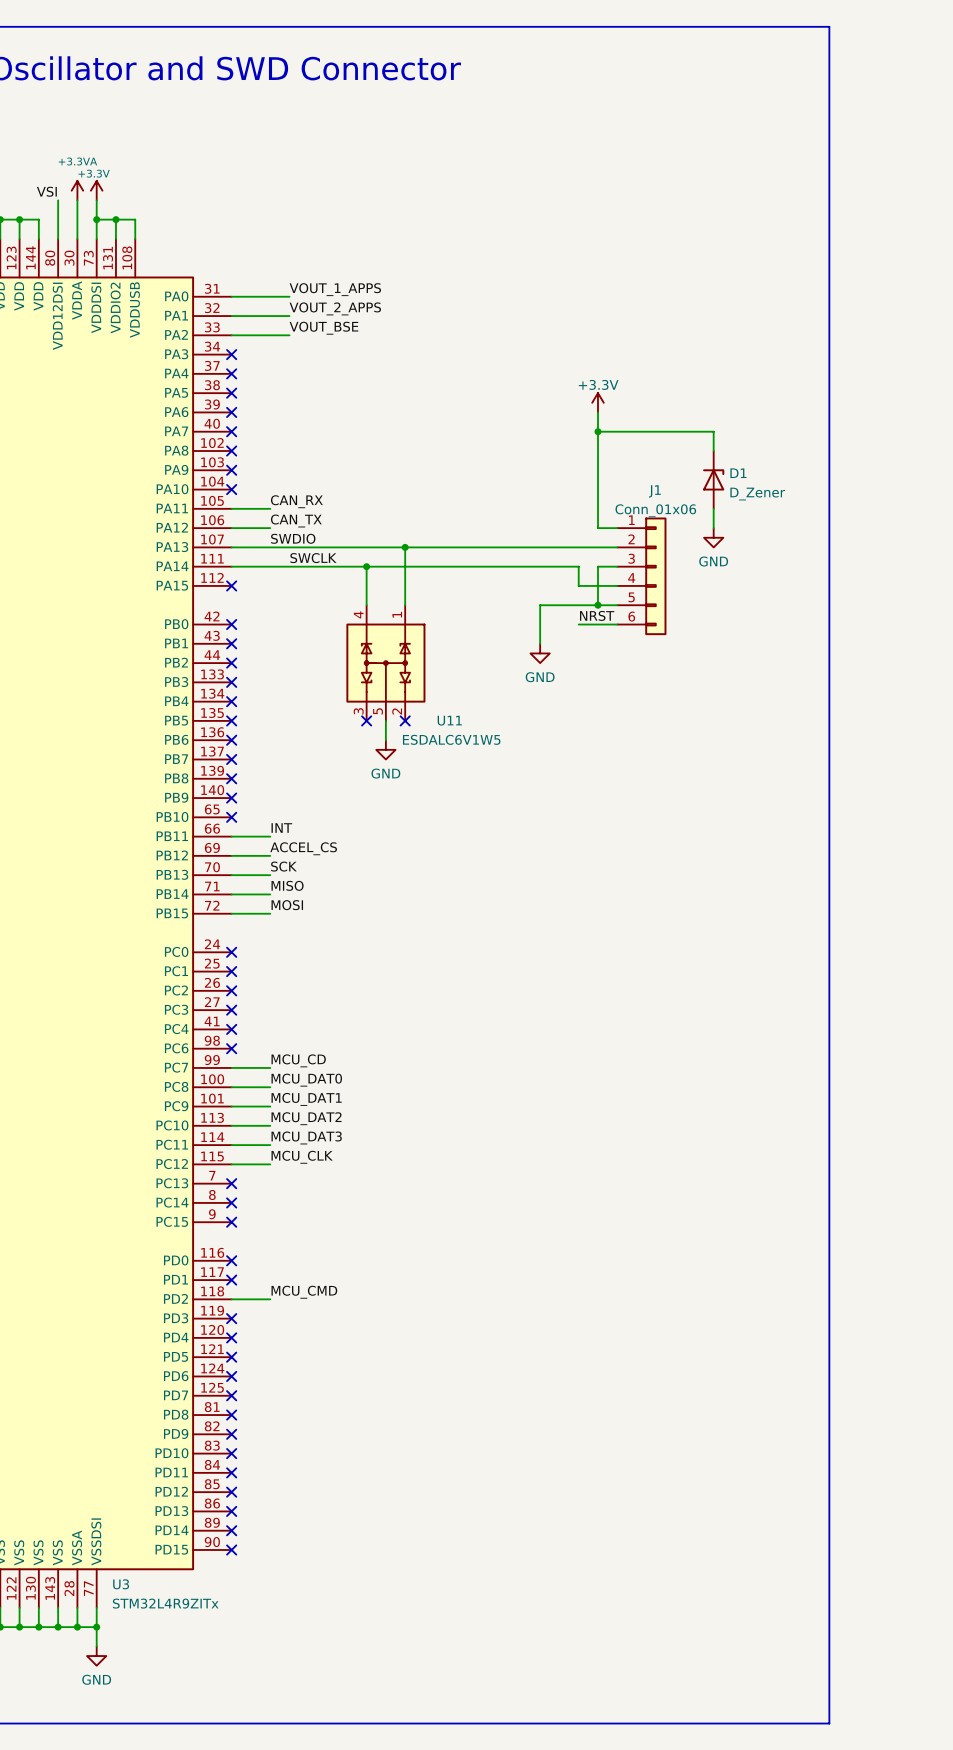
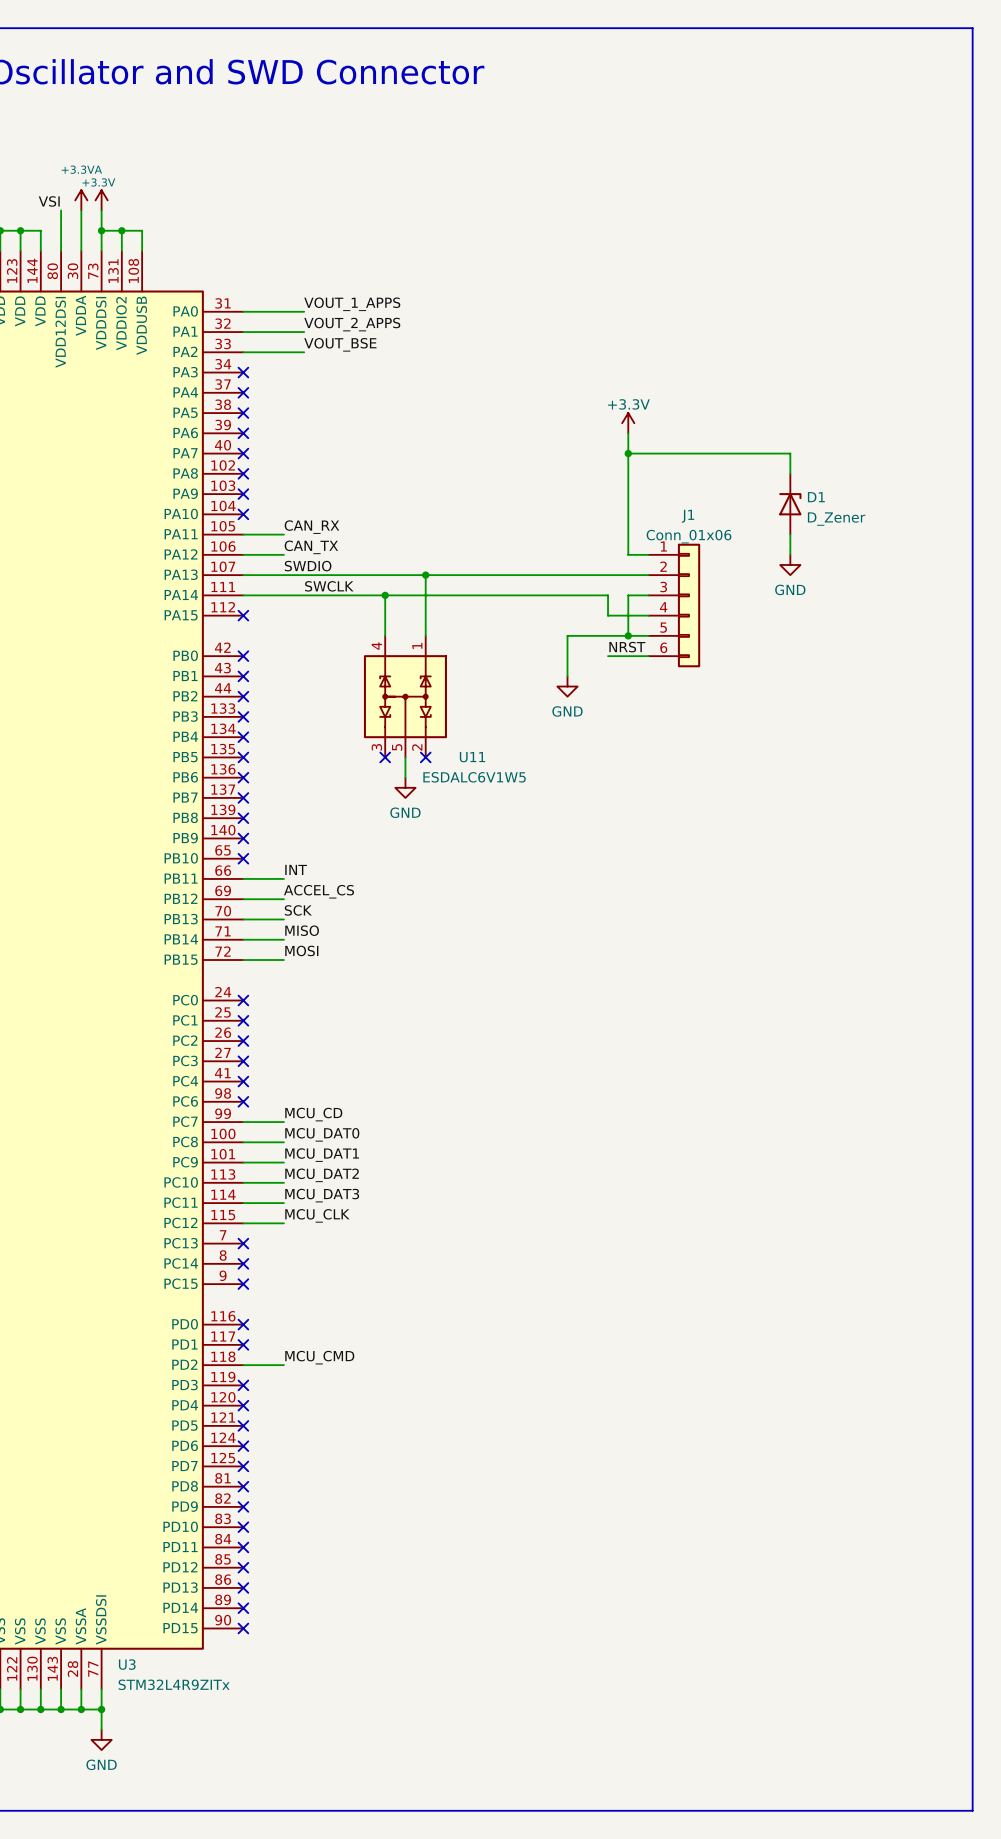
line: (829, 26) (829, 1723) -> (871, 28) (972, 28) (972, 1810) (871, 1810)
wire: (713, 431) (713, 450) -> (749, 453) (790, 453) (790, 473)
D1 position: (713, 479) -> (790, 504)
wire: (713, 508) (713, 528) -> (790, 534) (790, 554)
power symbol position: GND (713, 537) -> GND (790, 564)

